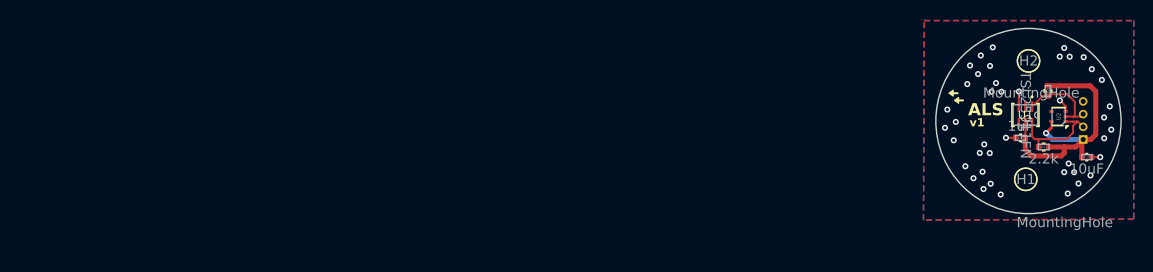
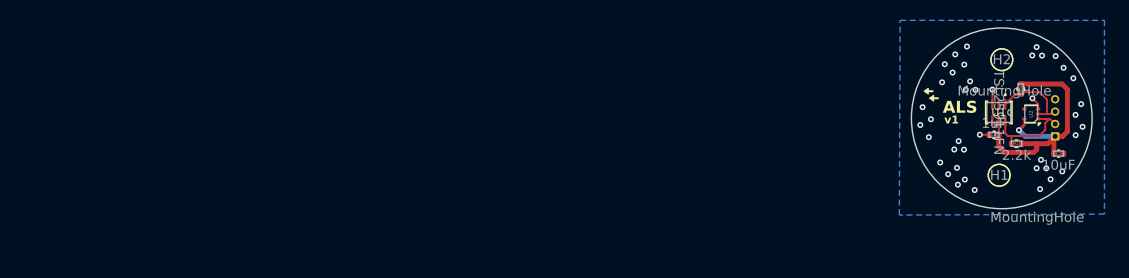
top zone outline: (924, 20) (1133, 20) (1133, 219) (923, 220) (924, 20) -> none
top track: (1091, 157) (1100, 157) -> none
via: (1100, 157) -> none

